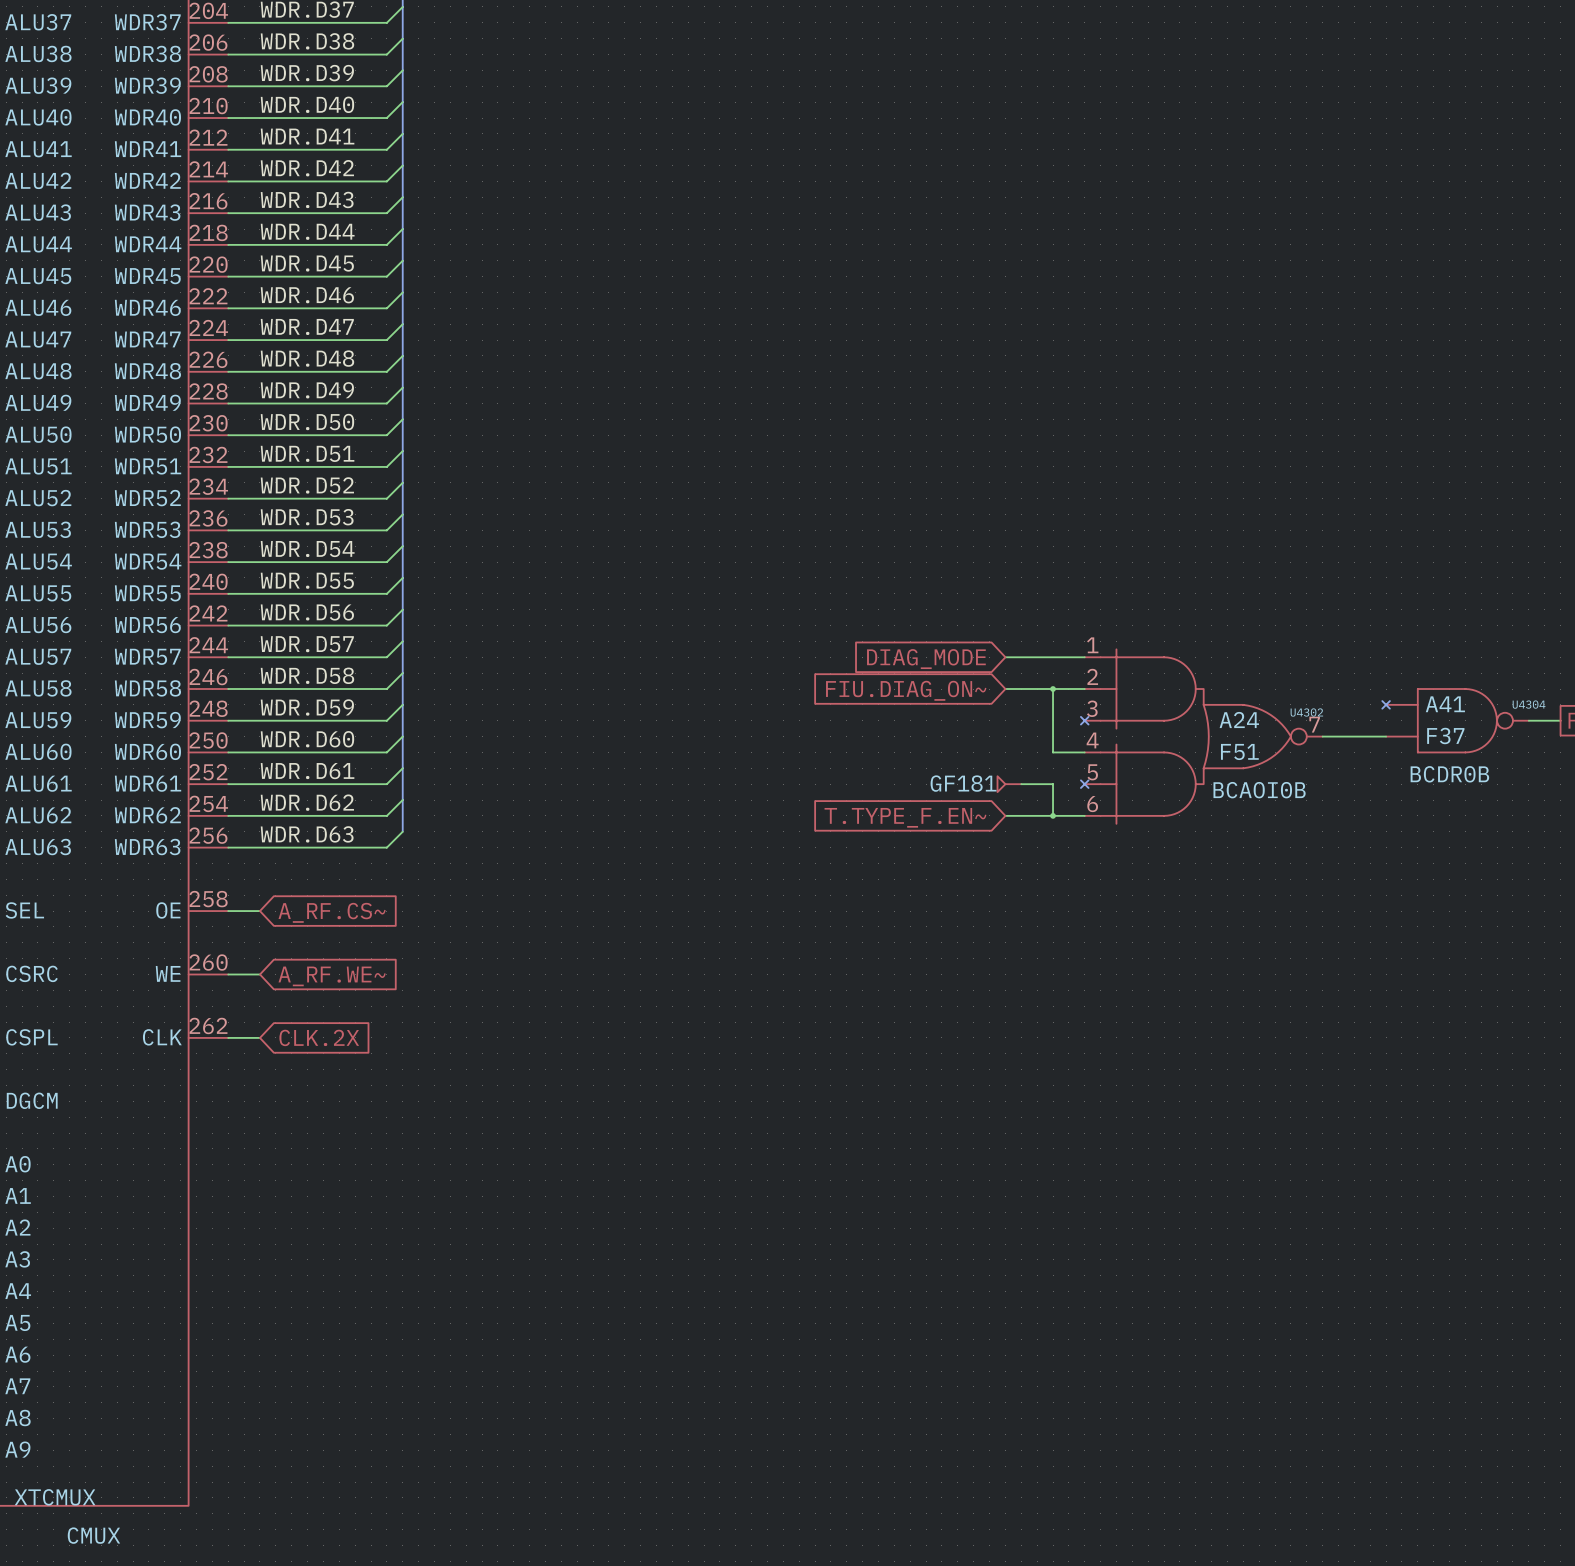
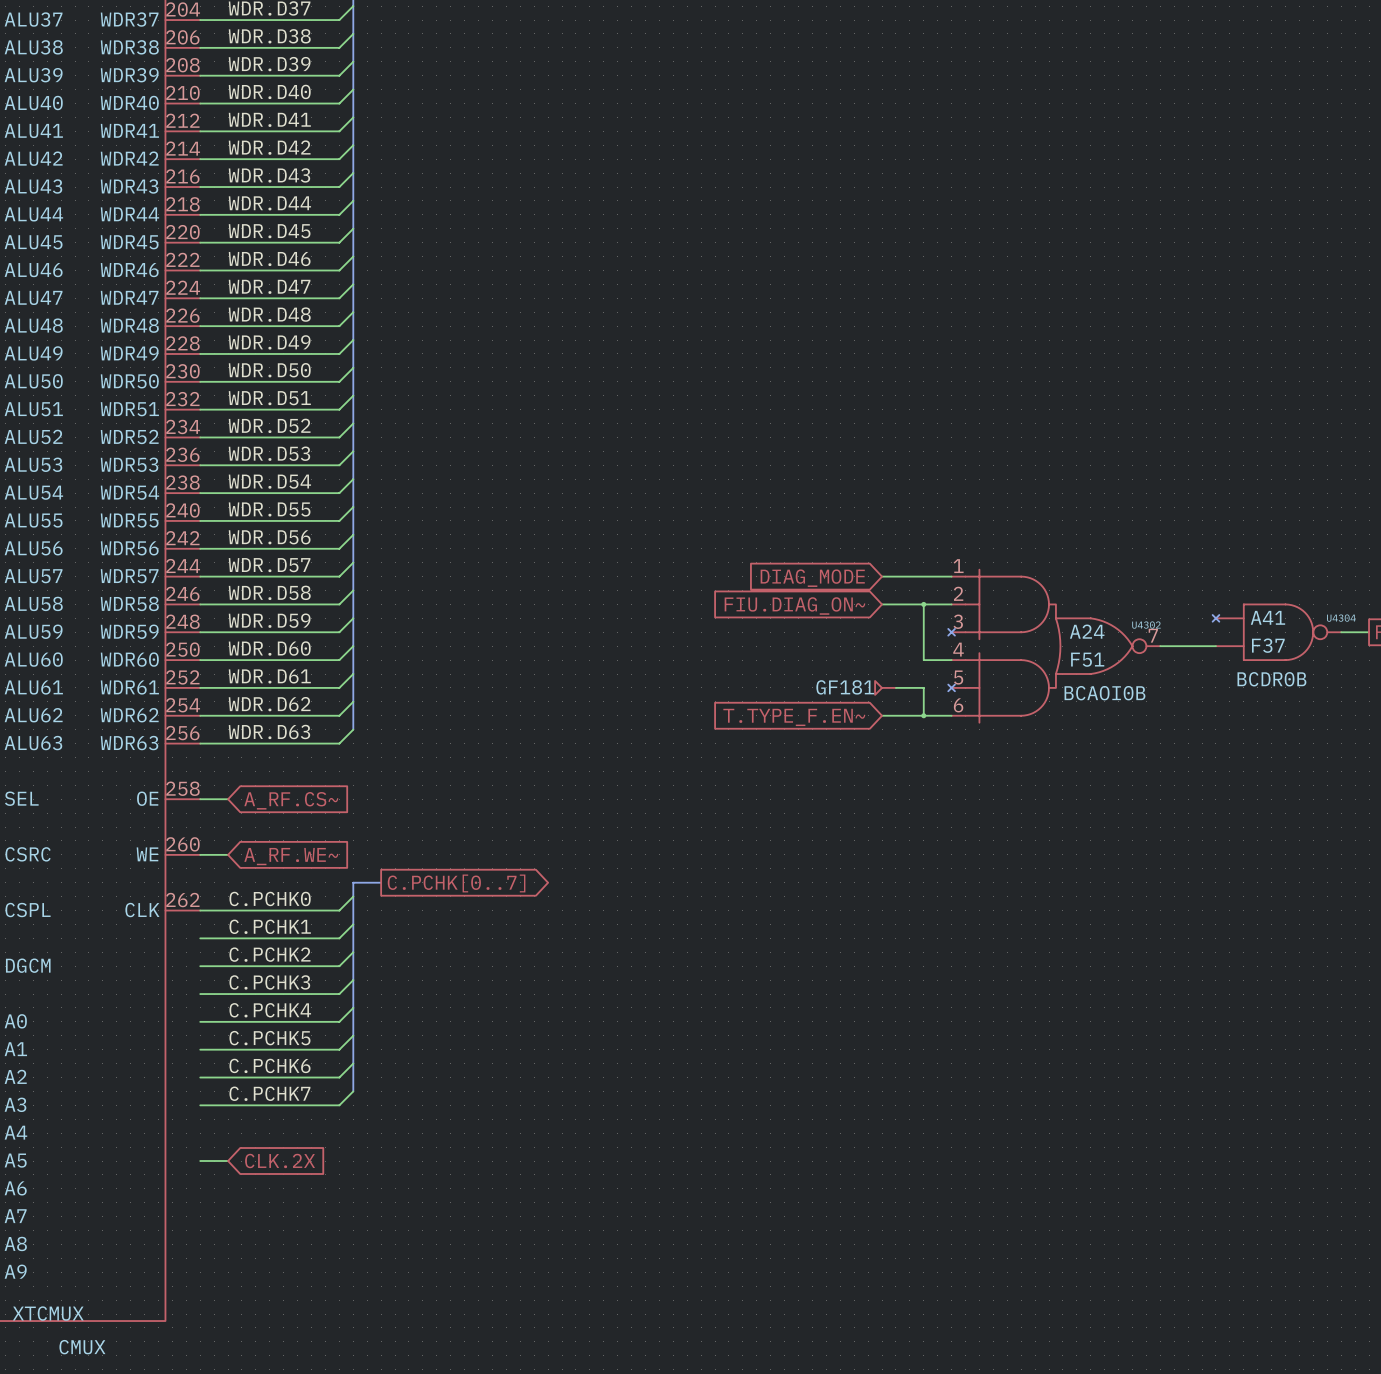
bus: none -> (381, 882) (353, 882) (353, 1091)
global label: none -> C.PCHK[0..7] (456, 883)
wire: none -> (353, 896) (339, 910) (228, 910)
label: none -> C.PCHK0 (270, 898)
global label: CLK.2X (319, 1037) -> none
wire: none -> (353, 924) (339, 938) (200, 938)
label: none -> C.PCHK1 (270, 926)
wire: none -> (353, 952) (339, 966) (200, 966)
label: none -> C.PCHK2 (270, 954)
wire: none -> (353, 980) (339, 994) (200, 994)
label: none -> C.PCHK3 (269, 982)
wire: none -> (353, 1007) (339, 1021) (200, 1021)
label: none -> C.PCHK4 (270, 1010)
wire: none -> (353, 1035) (339, 1049) (200, 1049)
label: none -> C.PCHK5 (269, 1038)
wire: none -> (353, 1063) (339, 1077) (200, 1077)
label: none -> C.PCHK6 (269, 1065)
wire: none -> (353, 1091) (339, 1105) (200, 1105)
label: none -> C.PCHK7 (269, 1093)
wire: none -> (200, 1161) (228, 1161)
global label: none -> CLK.2X (280, 1161)

